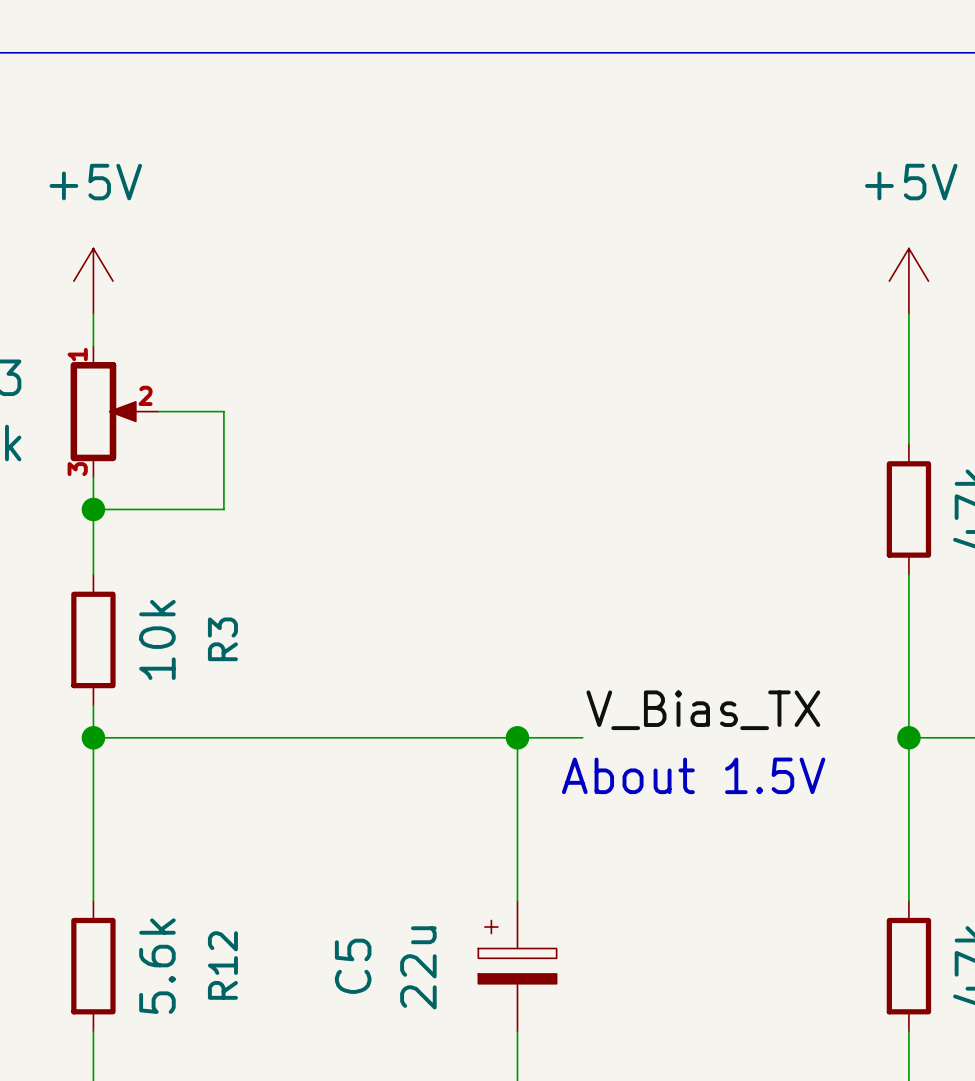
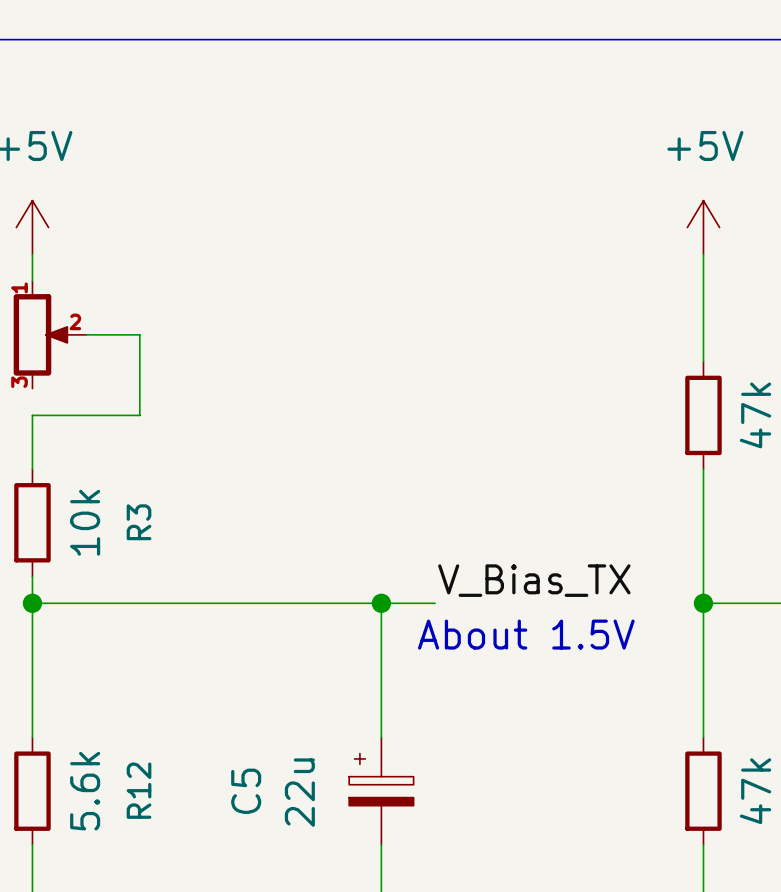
wire: (93, 476) (93, 509) -> none
junction: (93, 509) -> none

